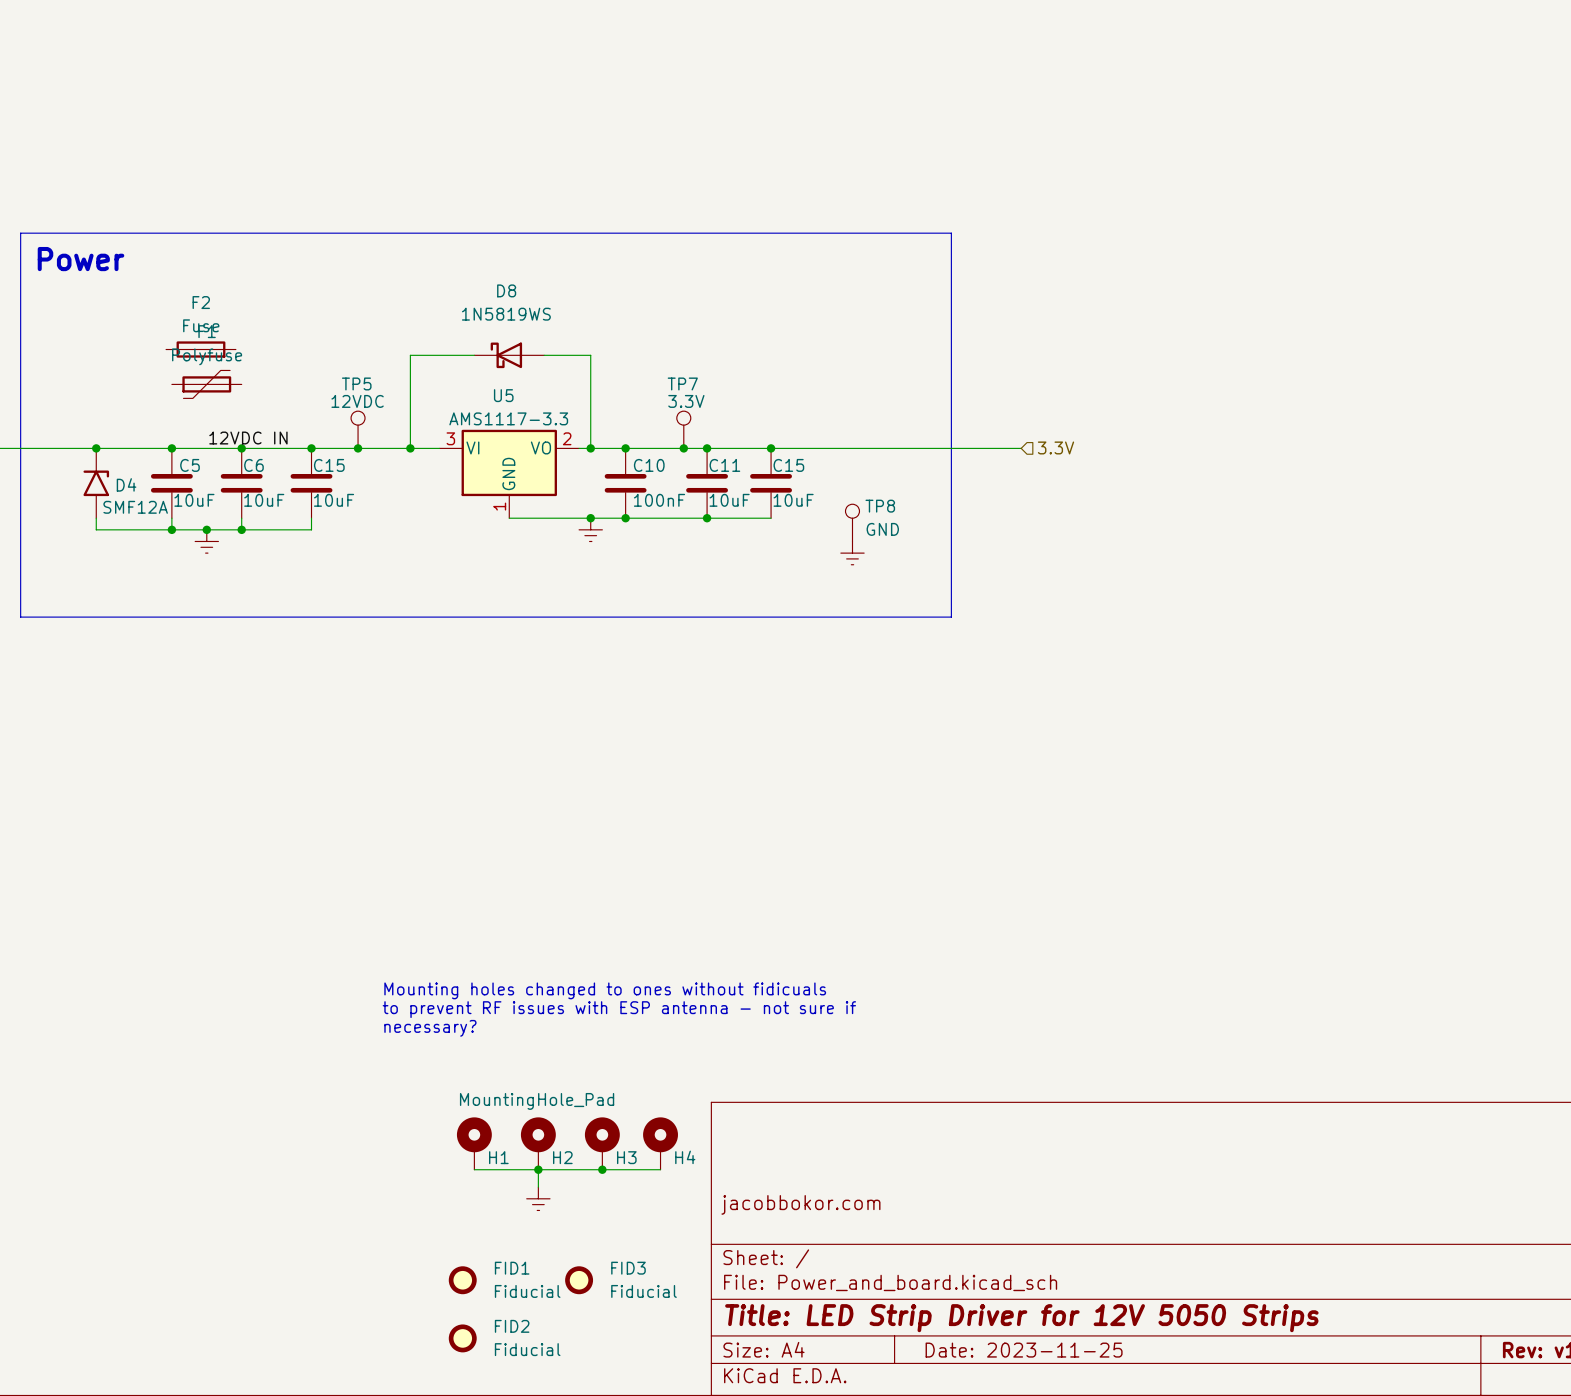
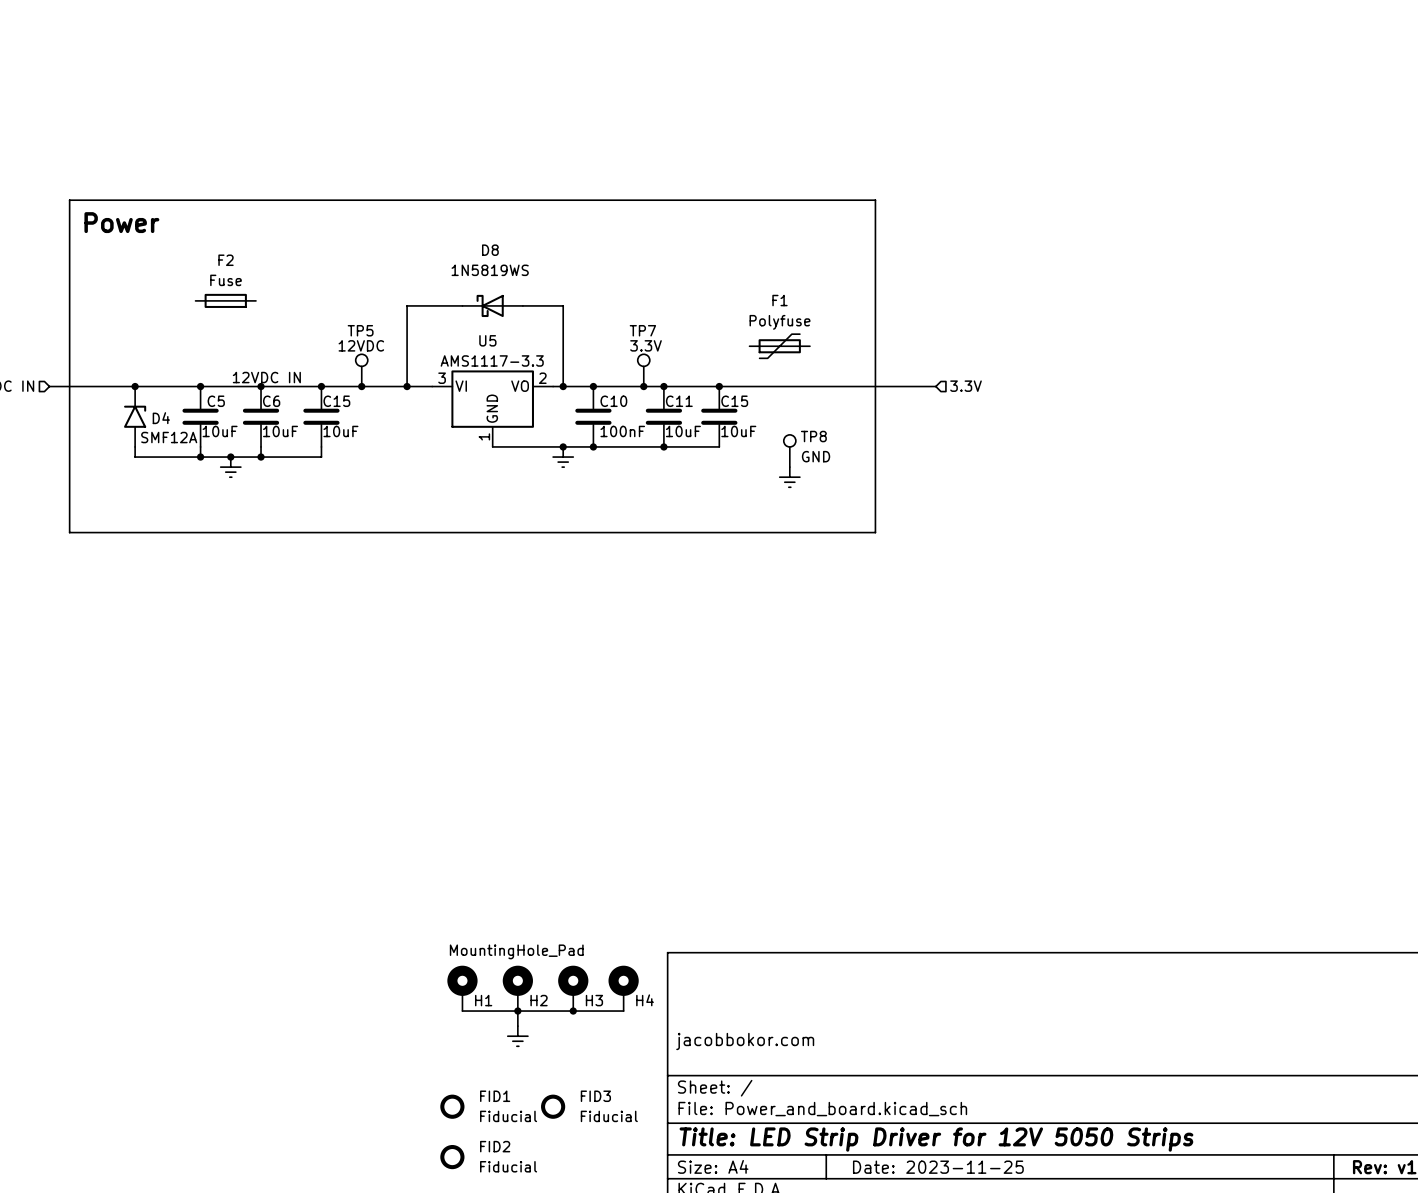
F1 position: (206, 384) -> (779, 346)
text: Mounting holes changed to ones without fidicuals (605, 990) -> none
text: to prevent RF issues with ESP antenna - not sure if (619, 1009) -> none
text: necessary? (430, 1028) -> none

